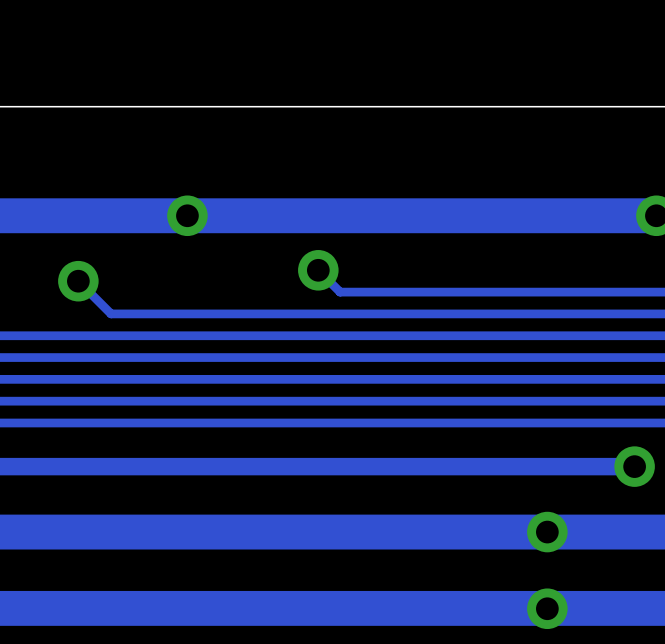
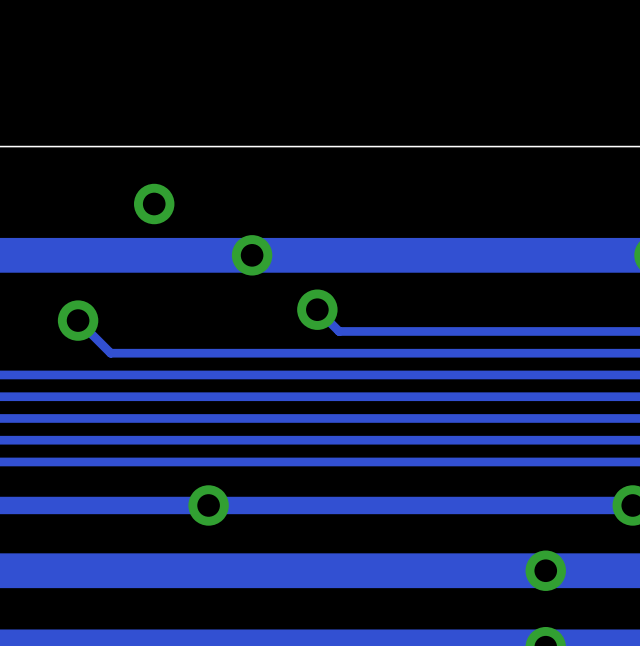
via: none -> (154, 204)
via: (187, 215) -> none
via: none -> (252, 255)
via: none -> (208, 505)

